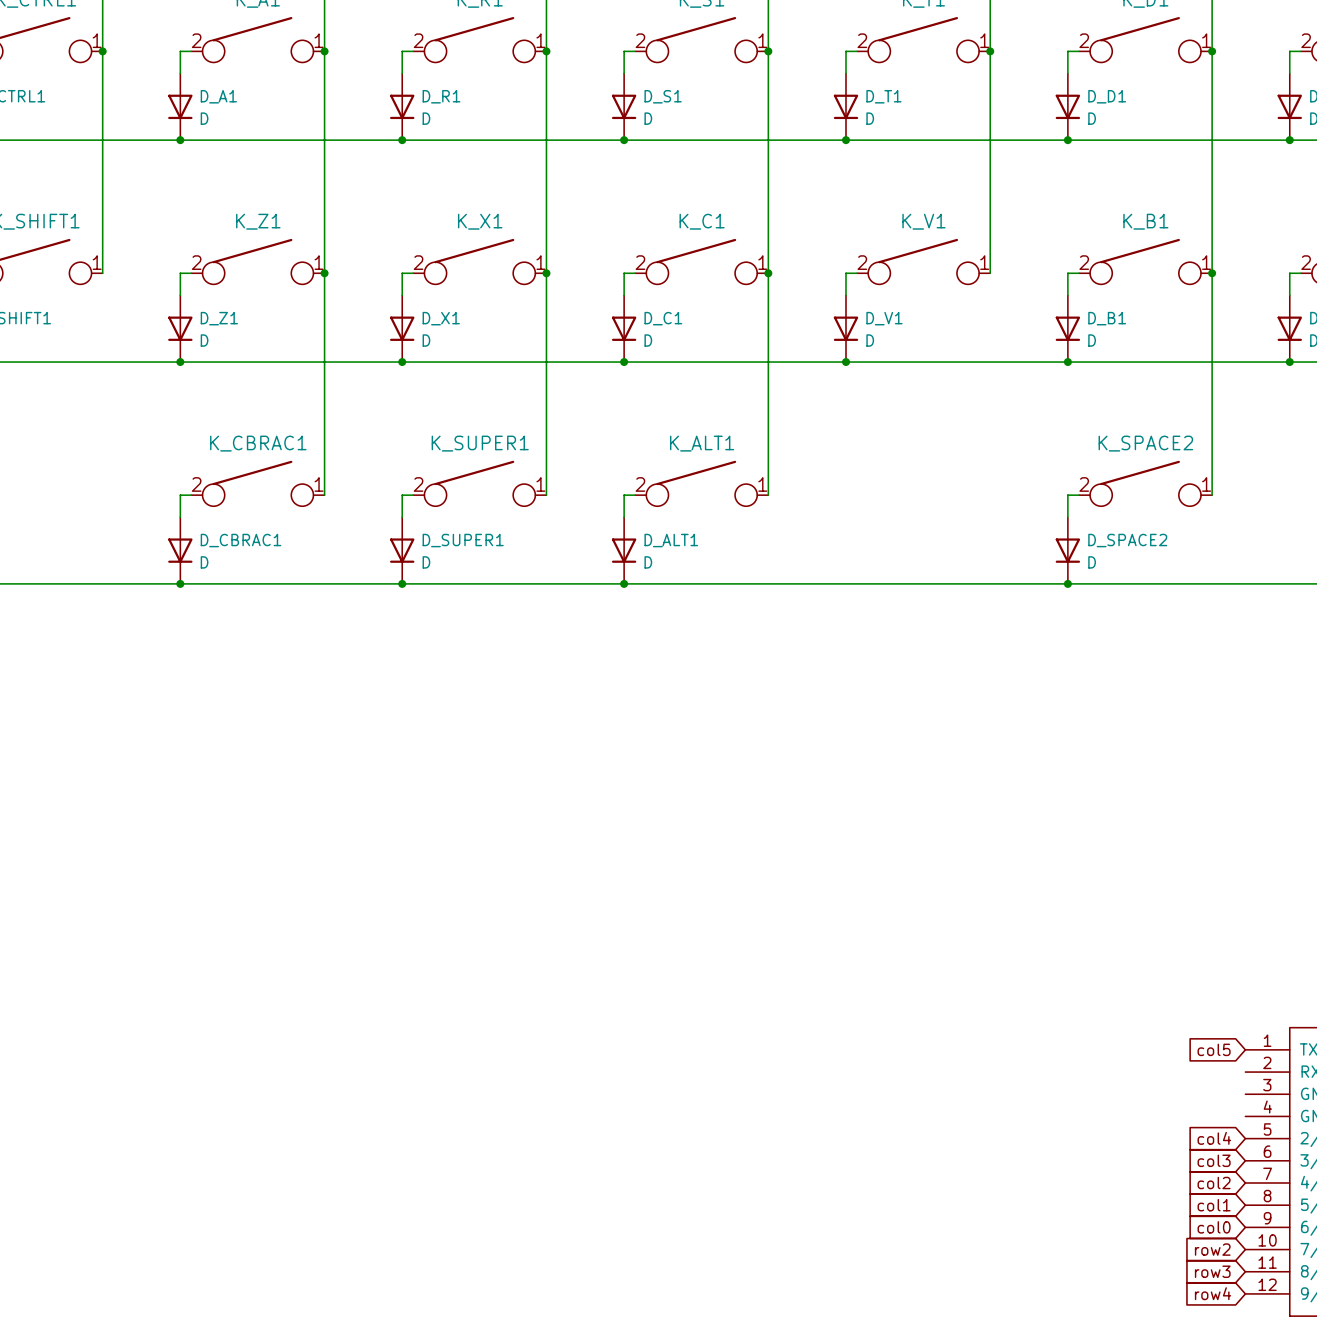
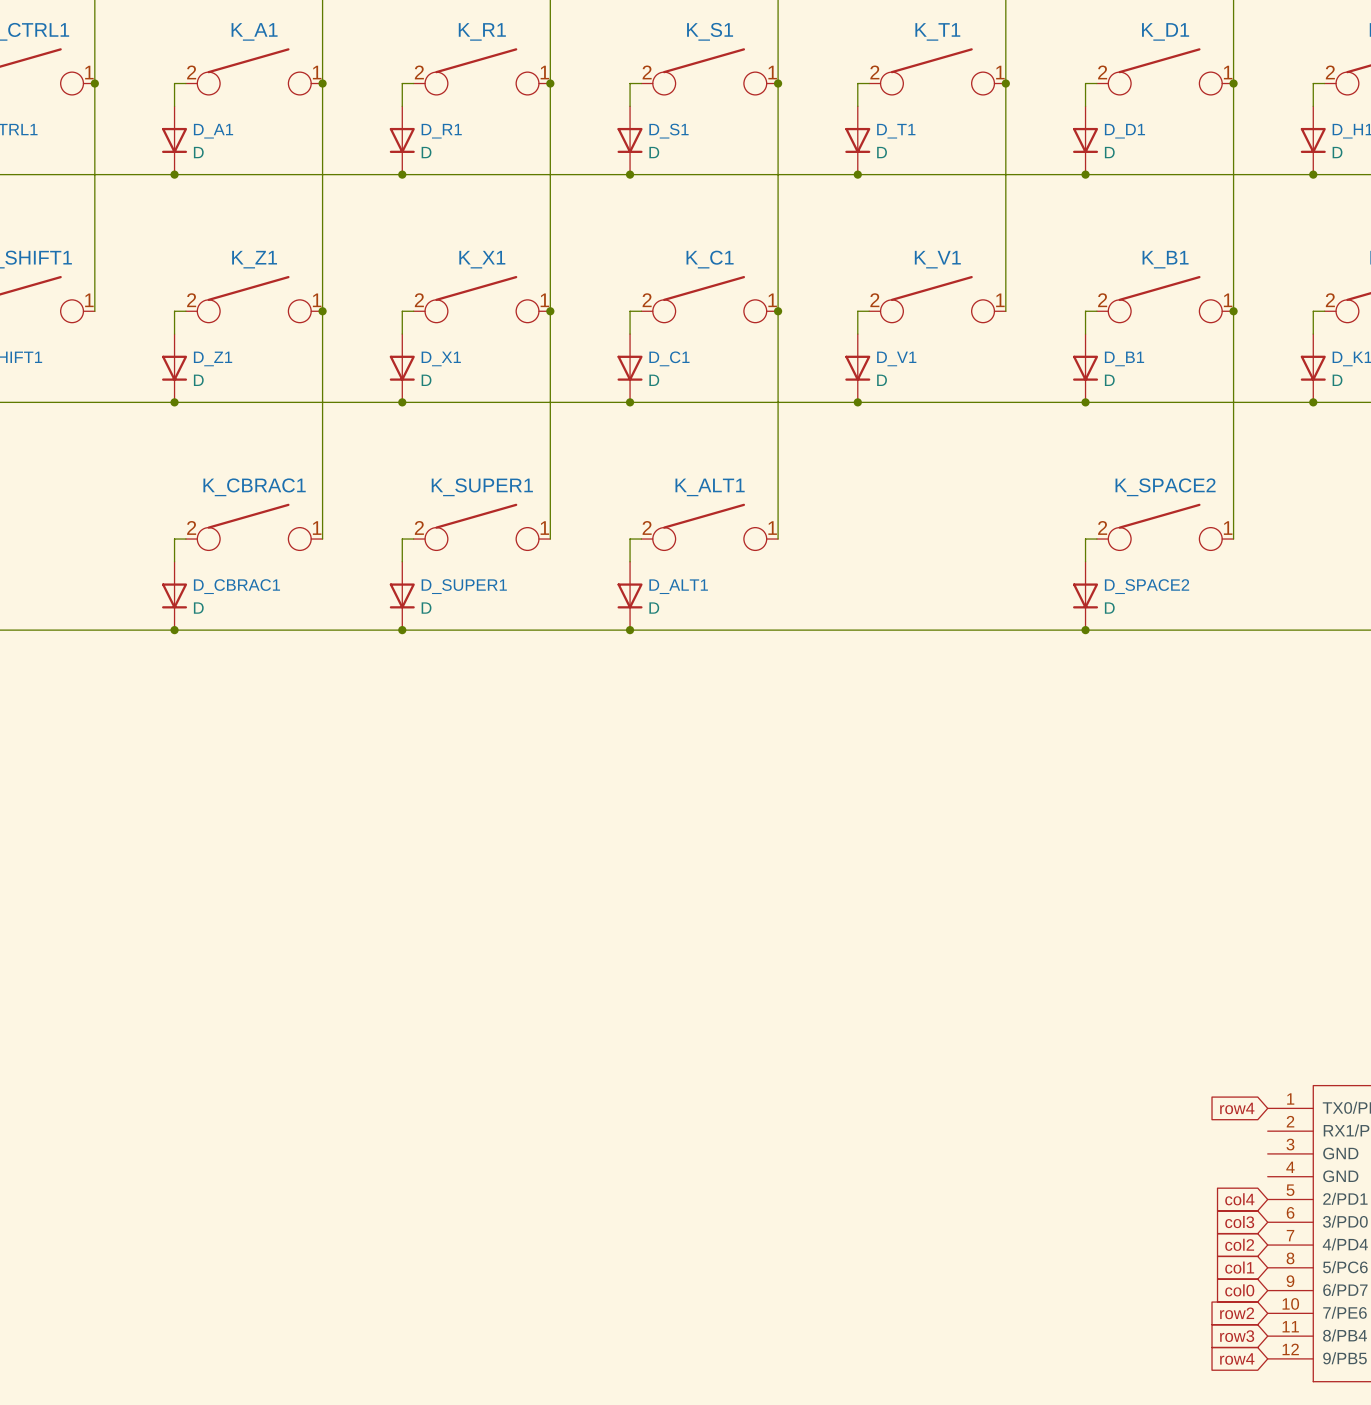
global label: col5 (1214, 1049) -> row4 (1237, 1108)

